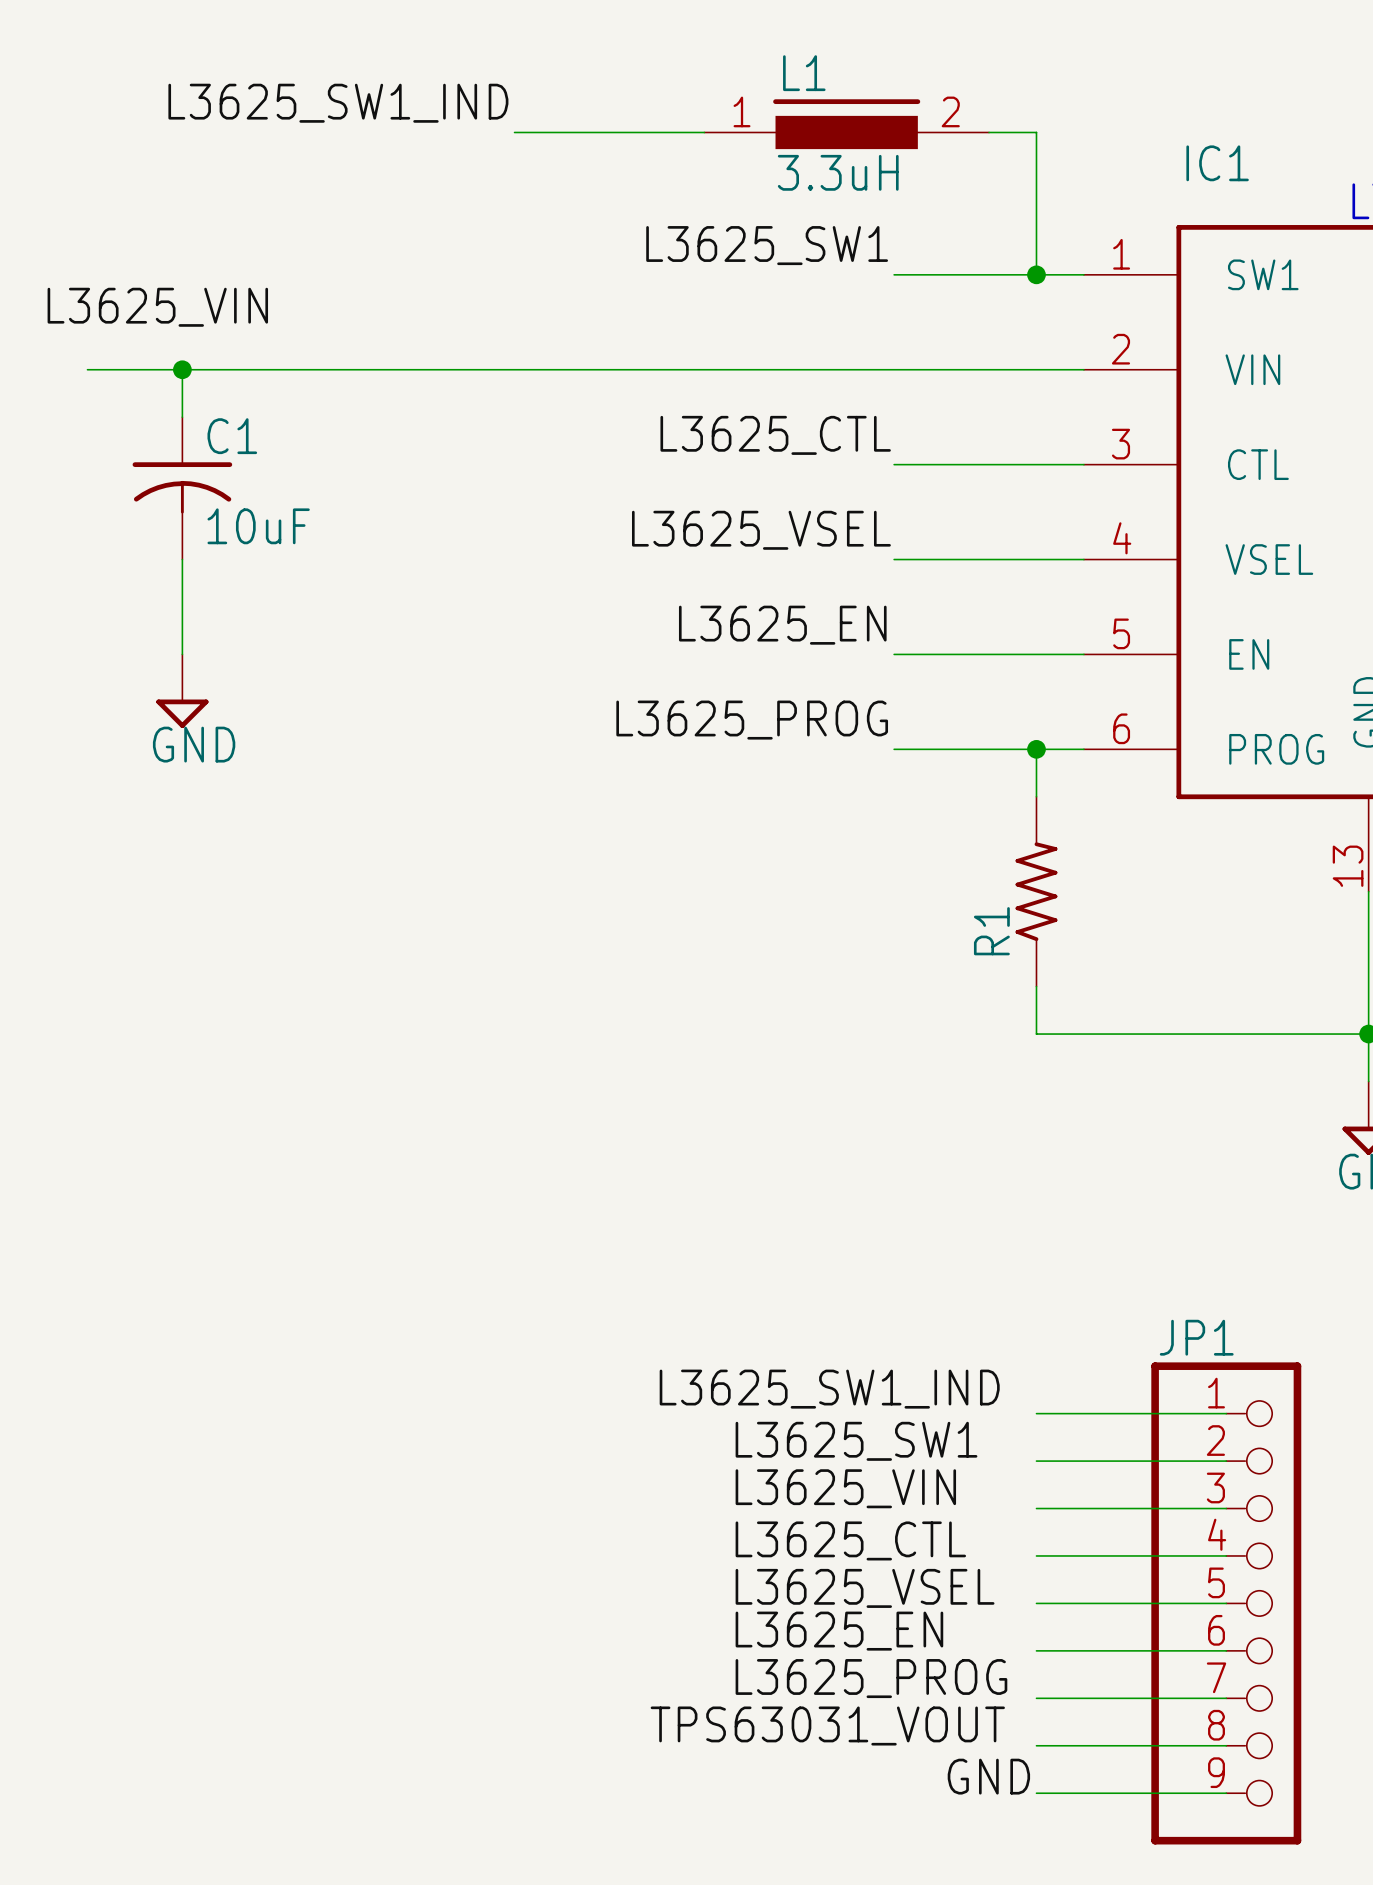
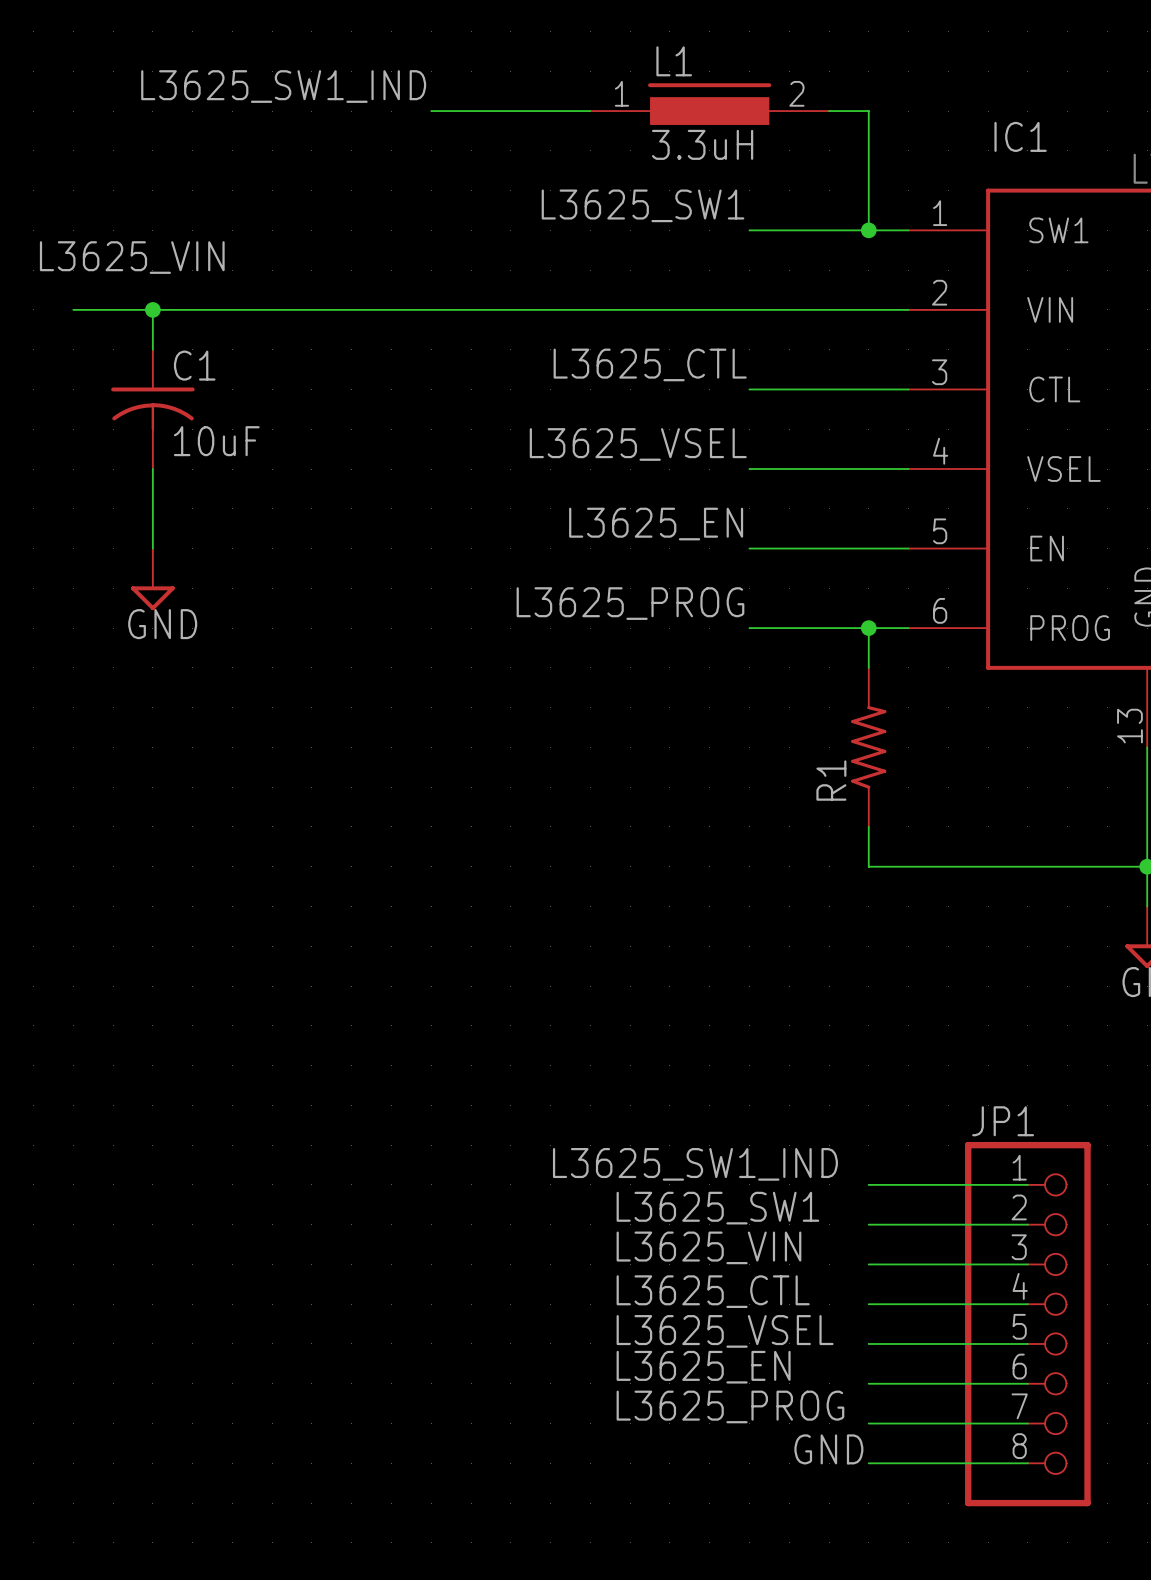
JP1 symbol: [1151, 1362, 1302, 1845] -> [965, 1141, 1091, 1507]
label: TPS63031_VOUT (827, 1726) -> none
label position: GND (988, 1776) -> GND (828, 1449)
wire: (1036, 1793) (1226, 1793) -> none

